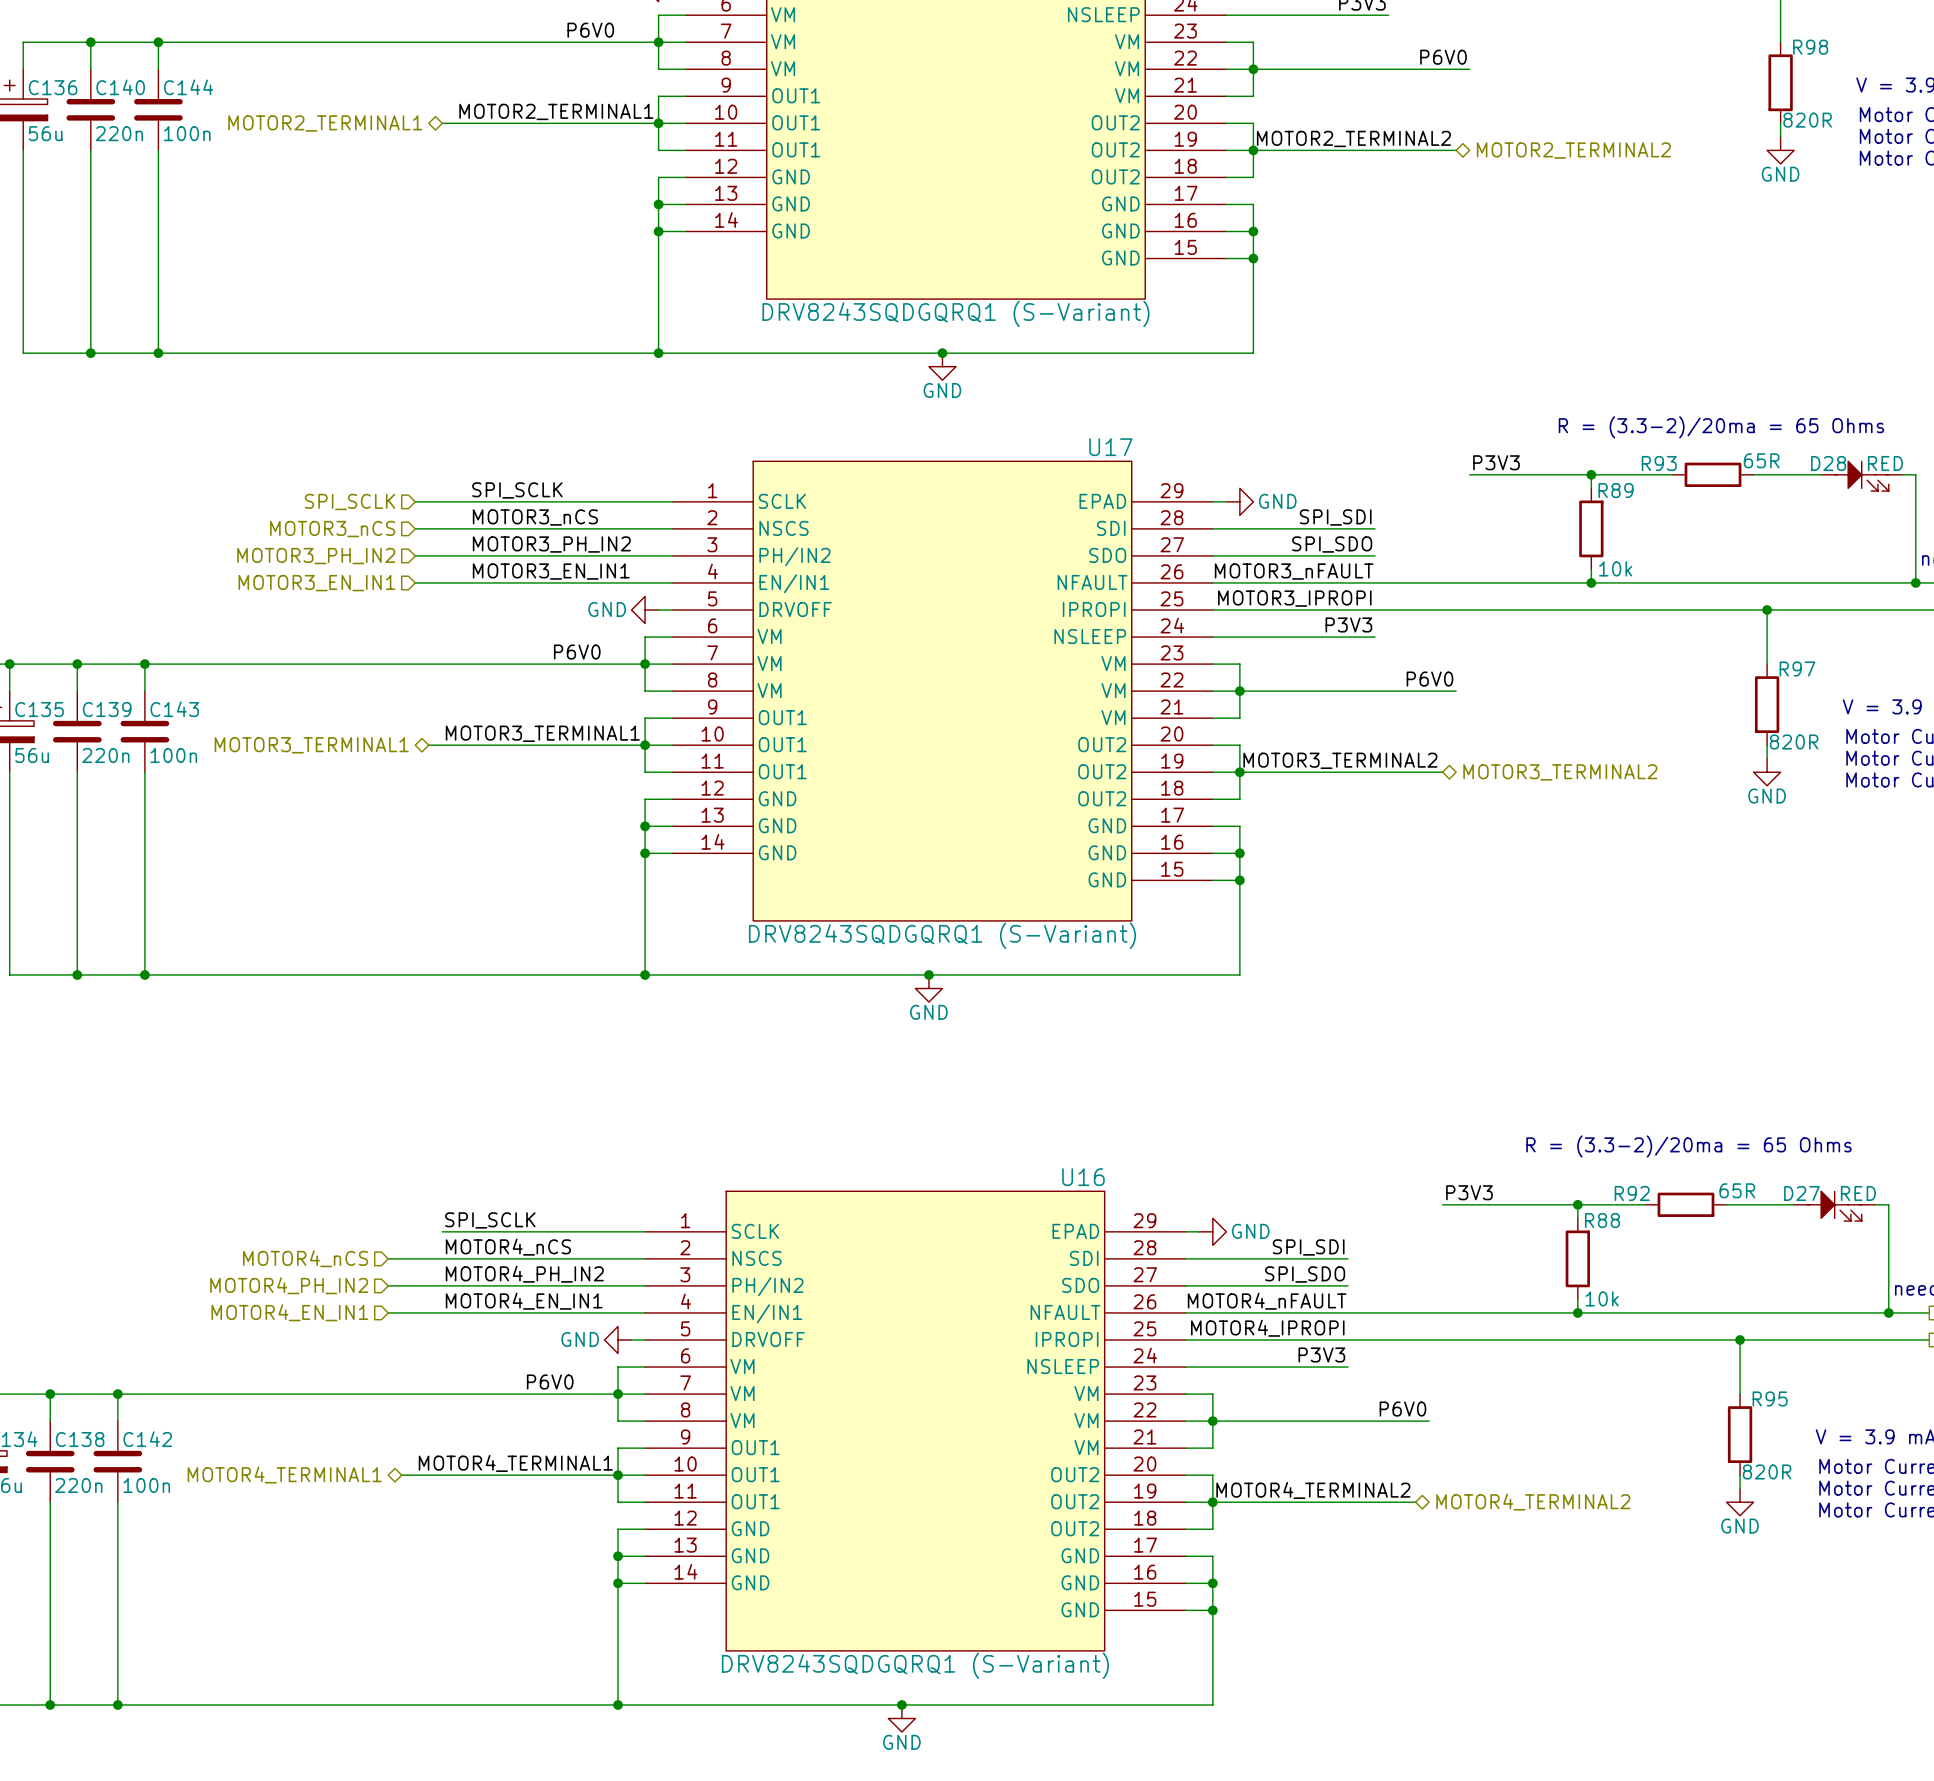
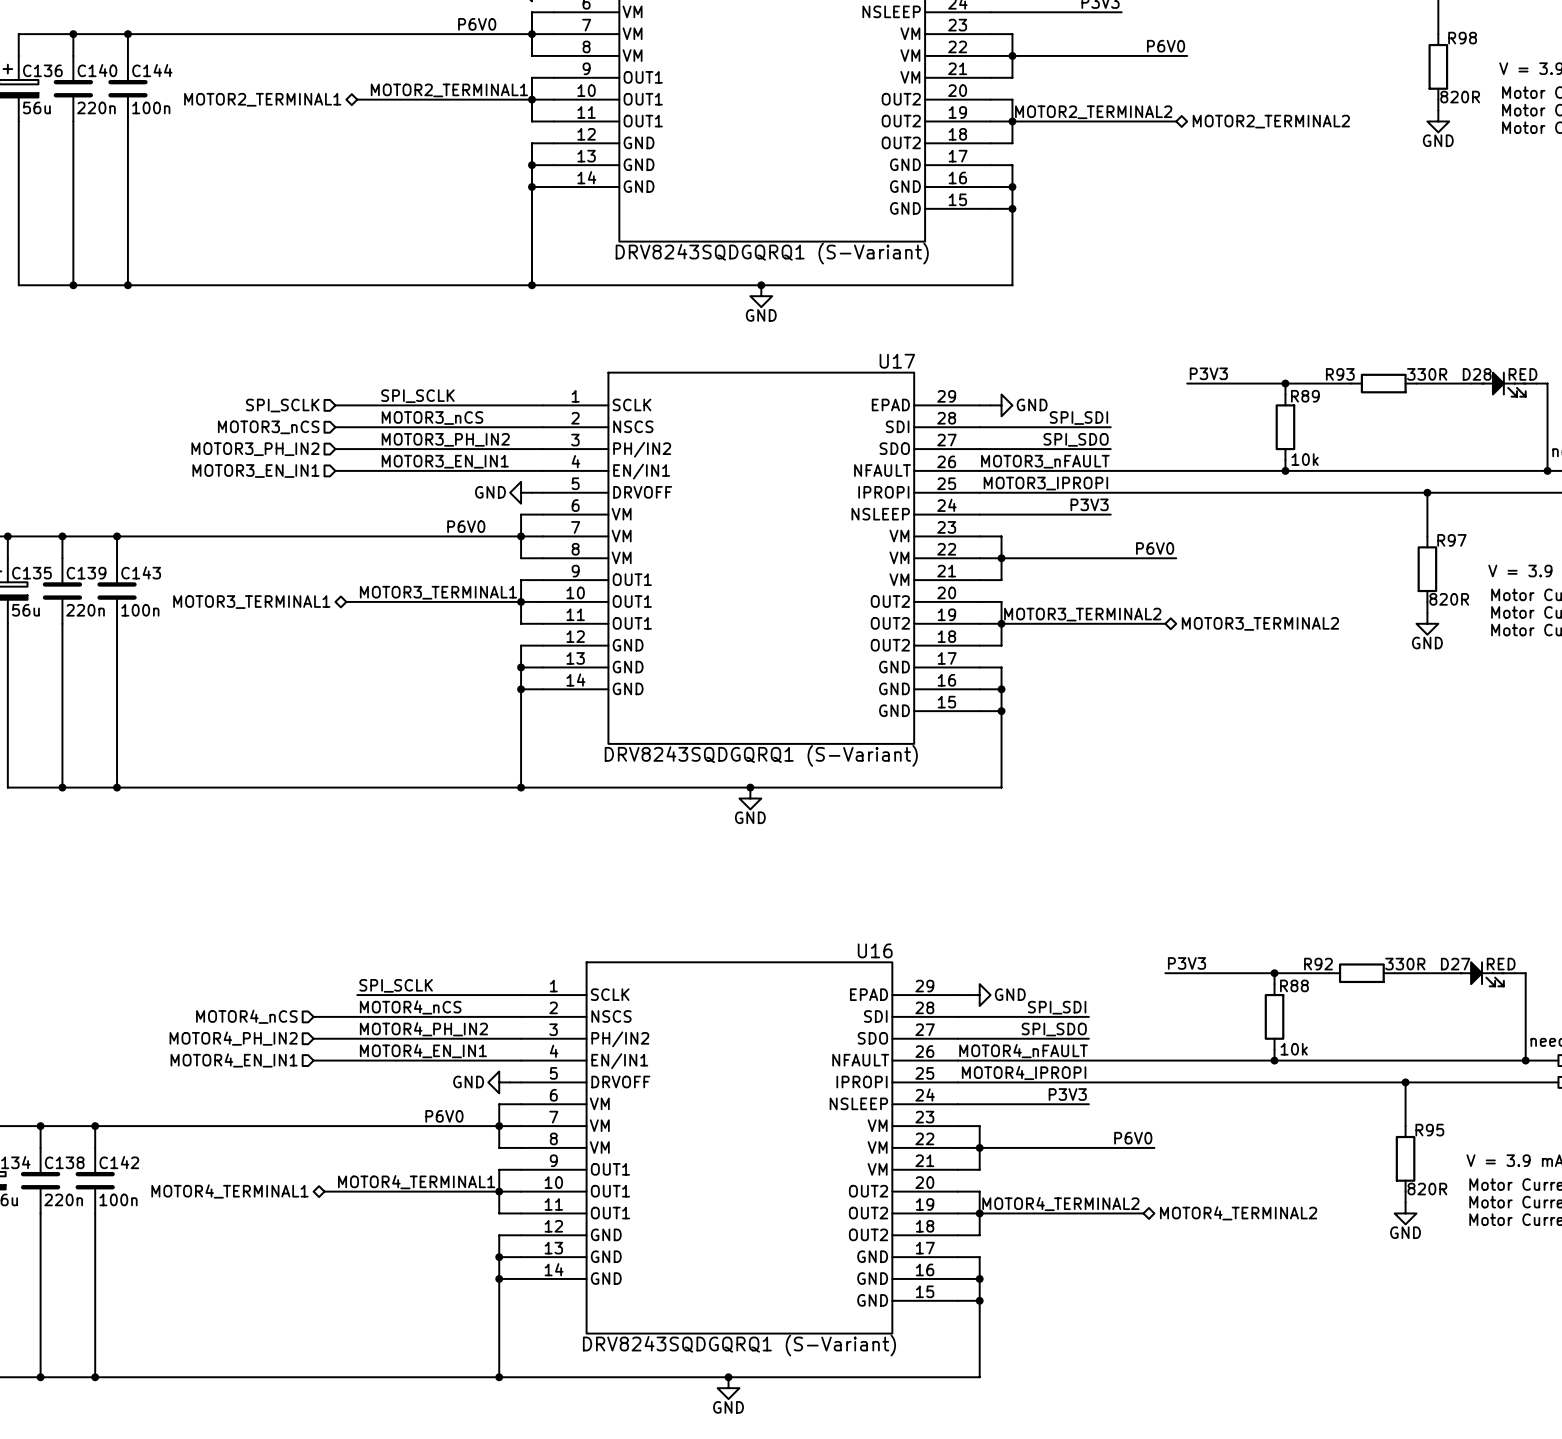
text: R = (3.3-2)/20ma = 65 Ohms (1721, 427) -> none
R93 value: 65R (1761, 460) -> 330R (1427, 374)
text: R = (3.3-2)/20ma = 65 Ohms (1689, 1146) -> none
R92 value: 65R (1737, 1190) -> 330R (1405, 964)

